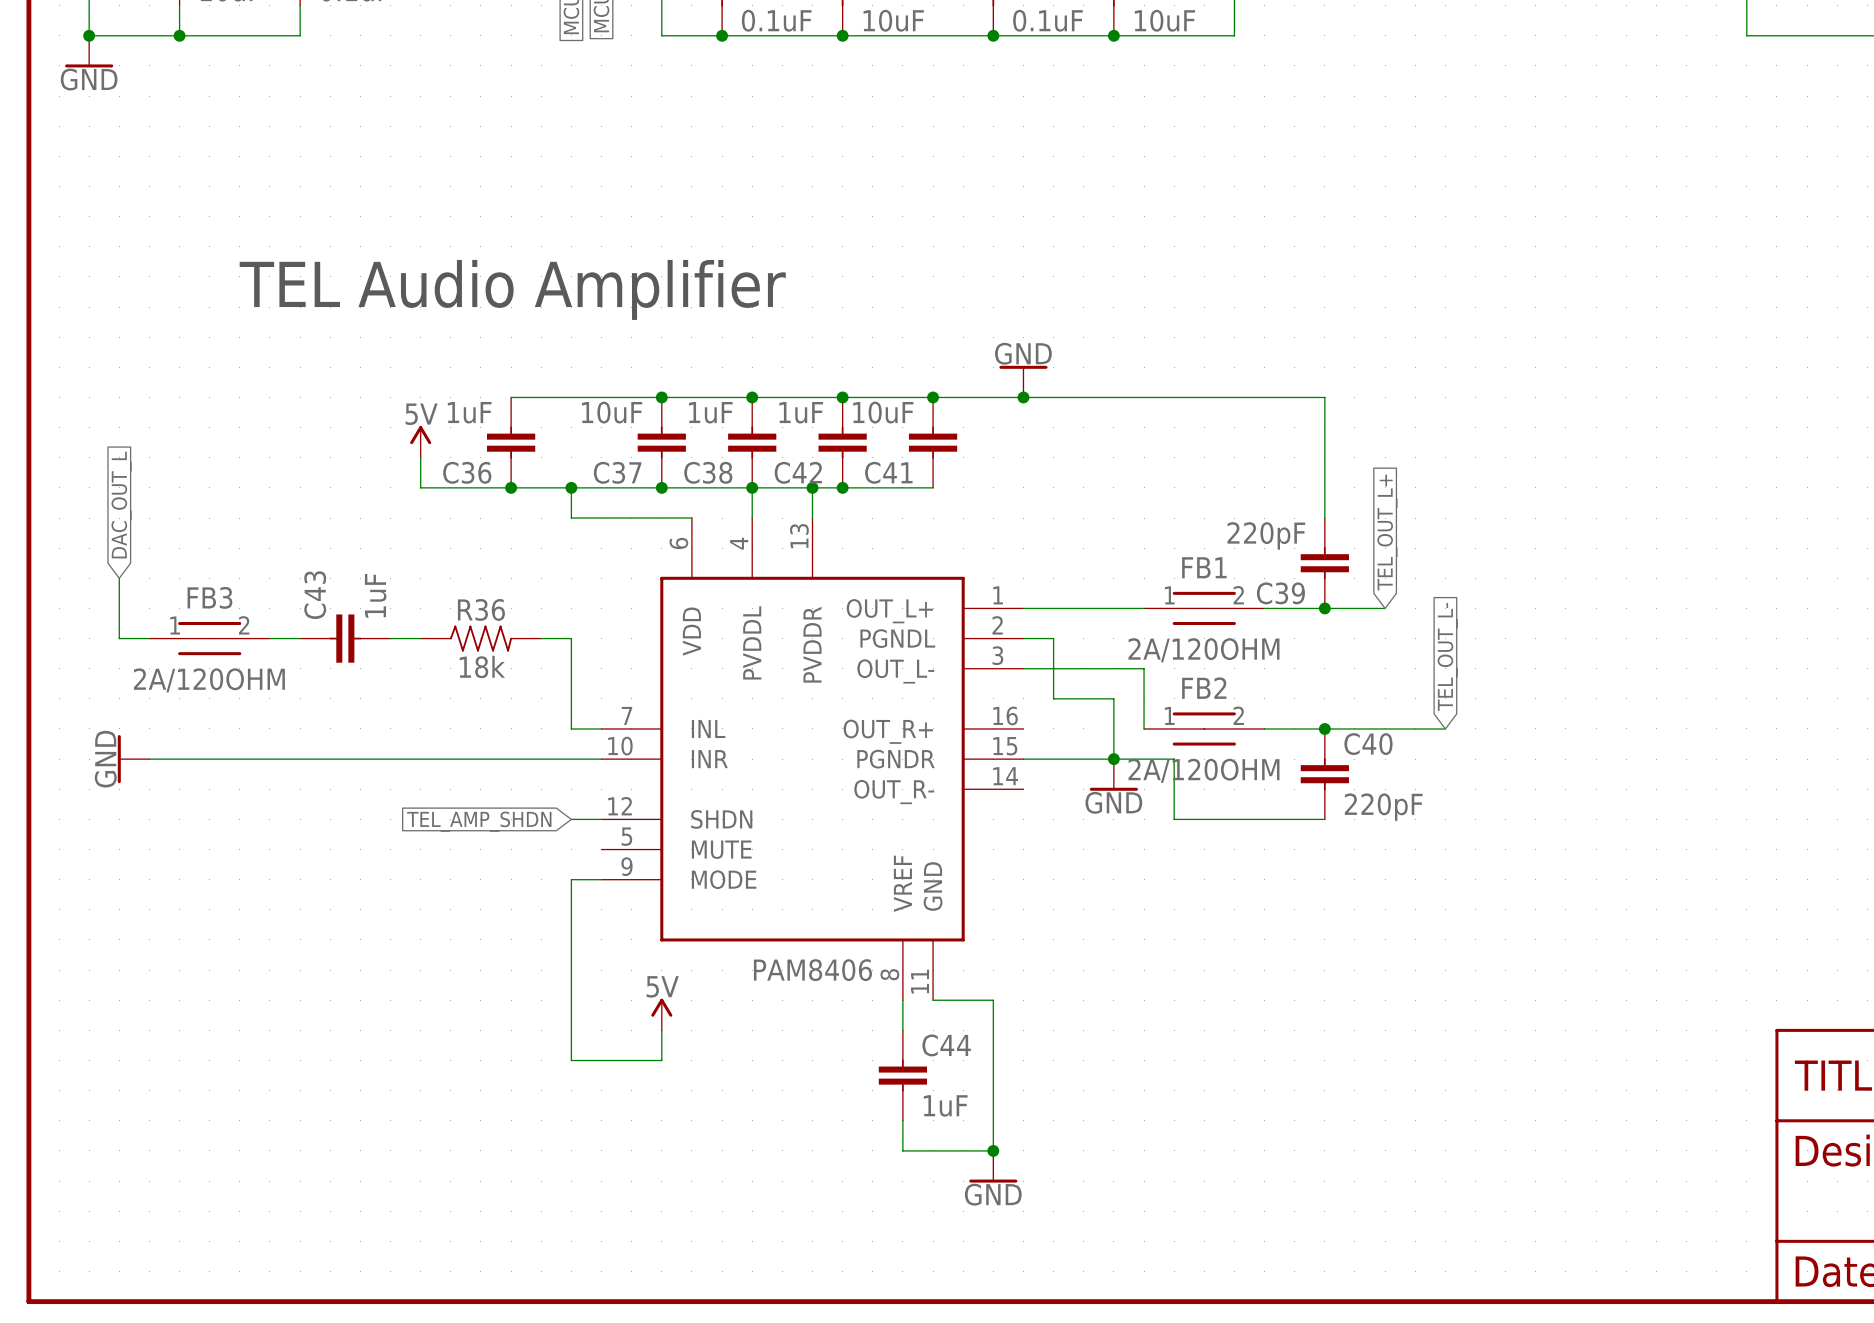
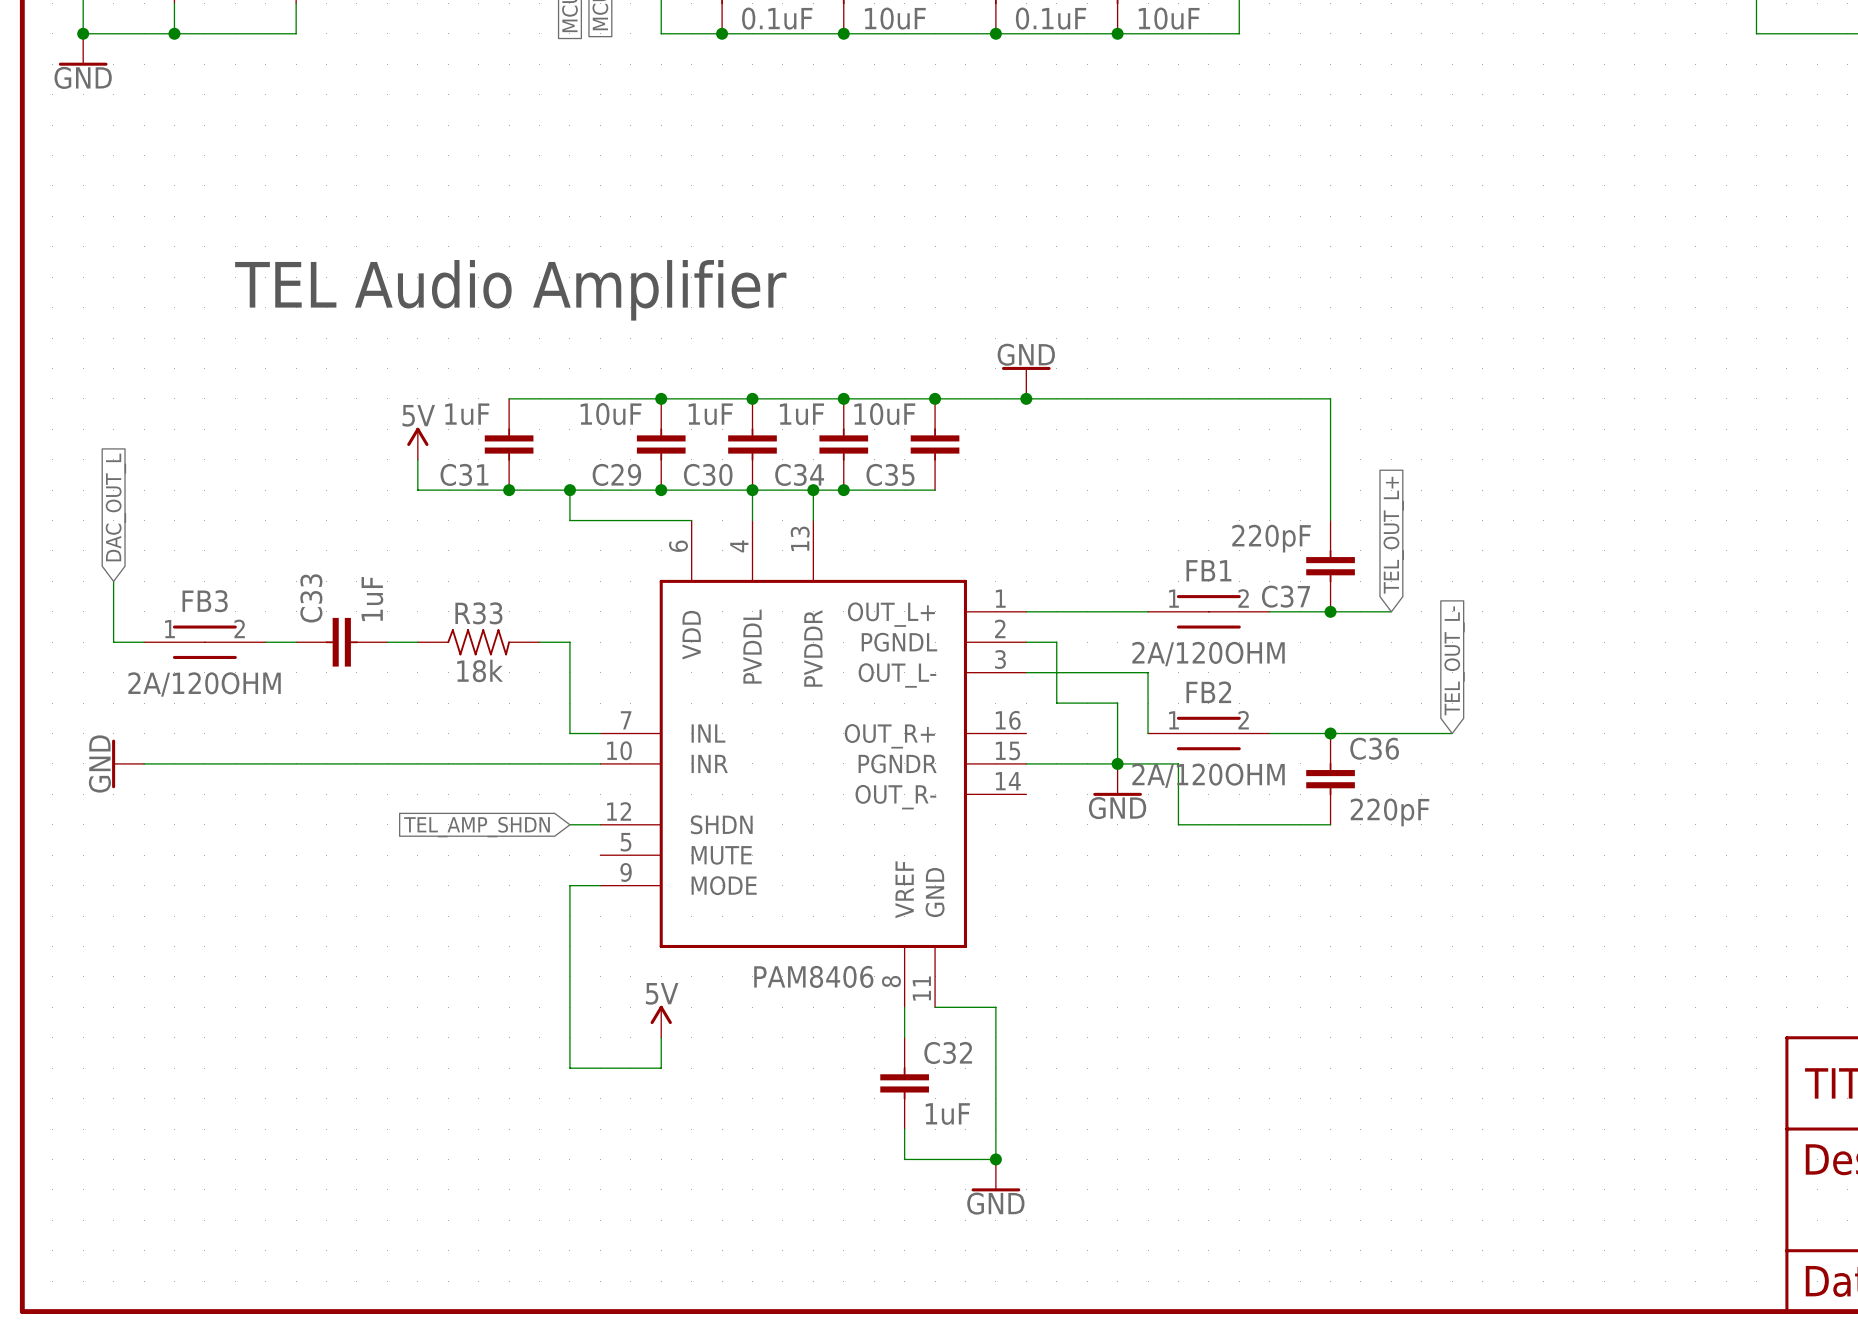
C36 name: C36 (467, 472) -> C31 (464, 474)
C37 name: C37 (617, 472) -> C29 (616, 474)
C38 name: C38 (708, 472) -> C30 (708, 474)
C42 name: C42 (798, 472) -> C34 (799, 474)
C41 name: C41 (888, 472) -> C35 (890, 474)
C39 name: C39 (1280, 593) -> C37 (1286, 596)
C43 name: C43 (315, 595) -> C33 (311, 598)
R36 name: R36 (481, 609) -> R33 (478, 613)
C40 name: C40 (1368, 744) -> C36 (1374, 748)
C44 name: C44 (946, 1045) -> C32 (948, 1052)

